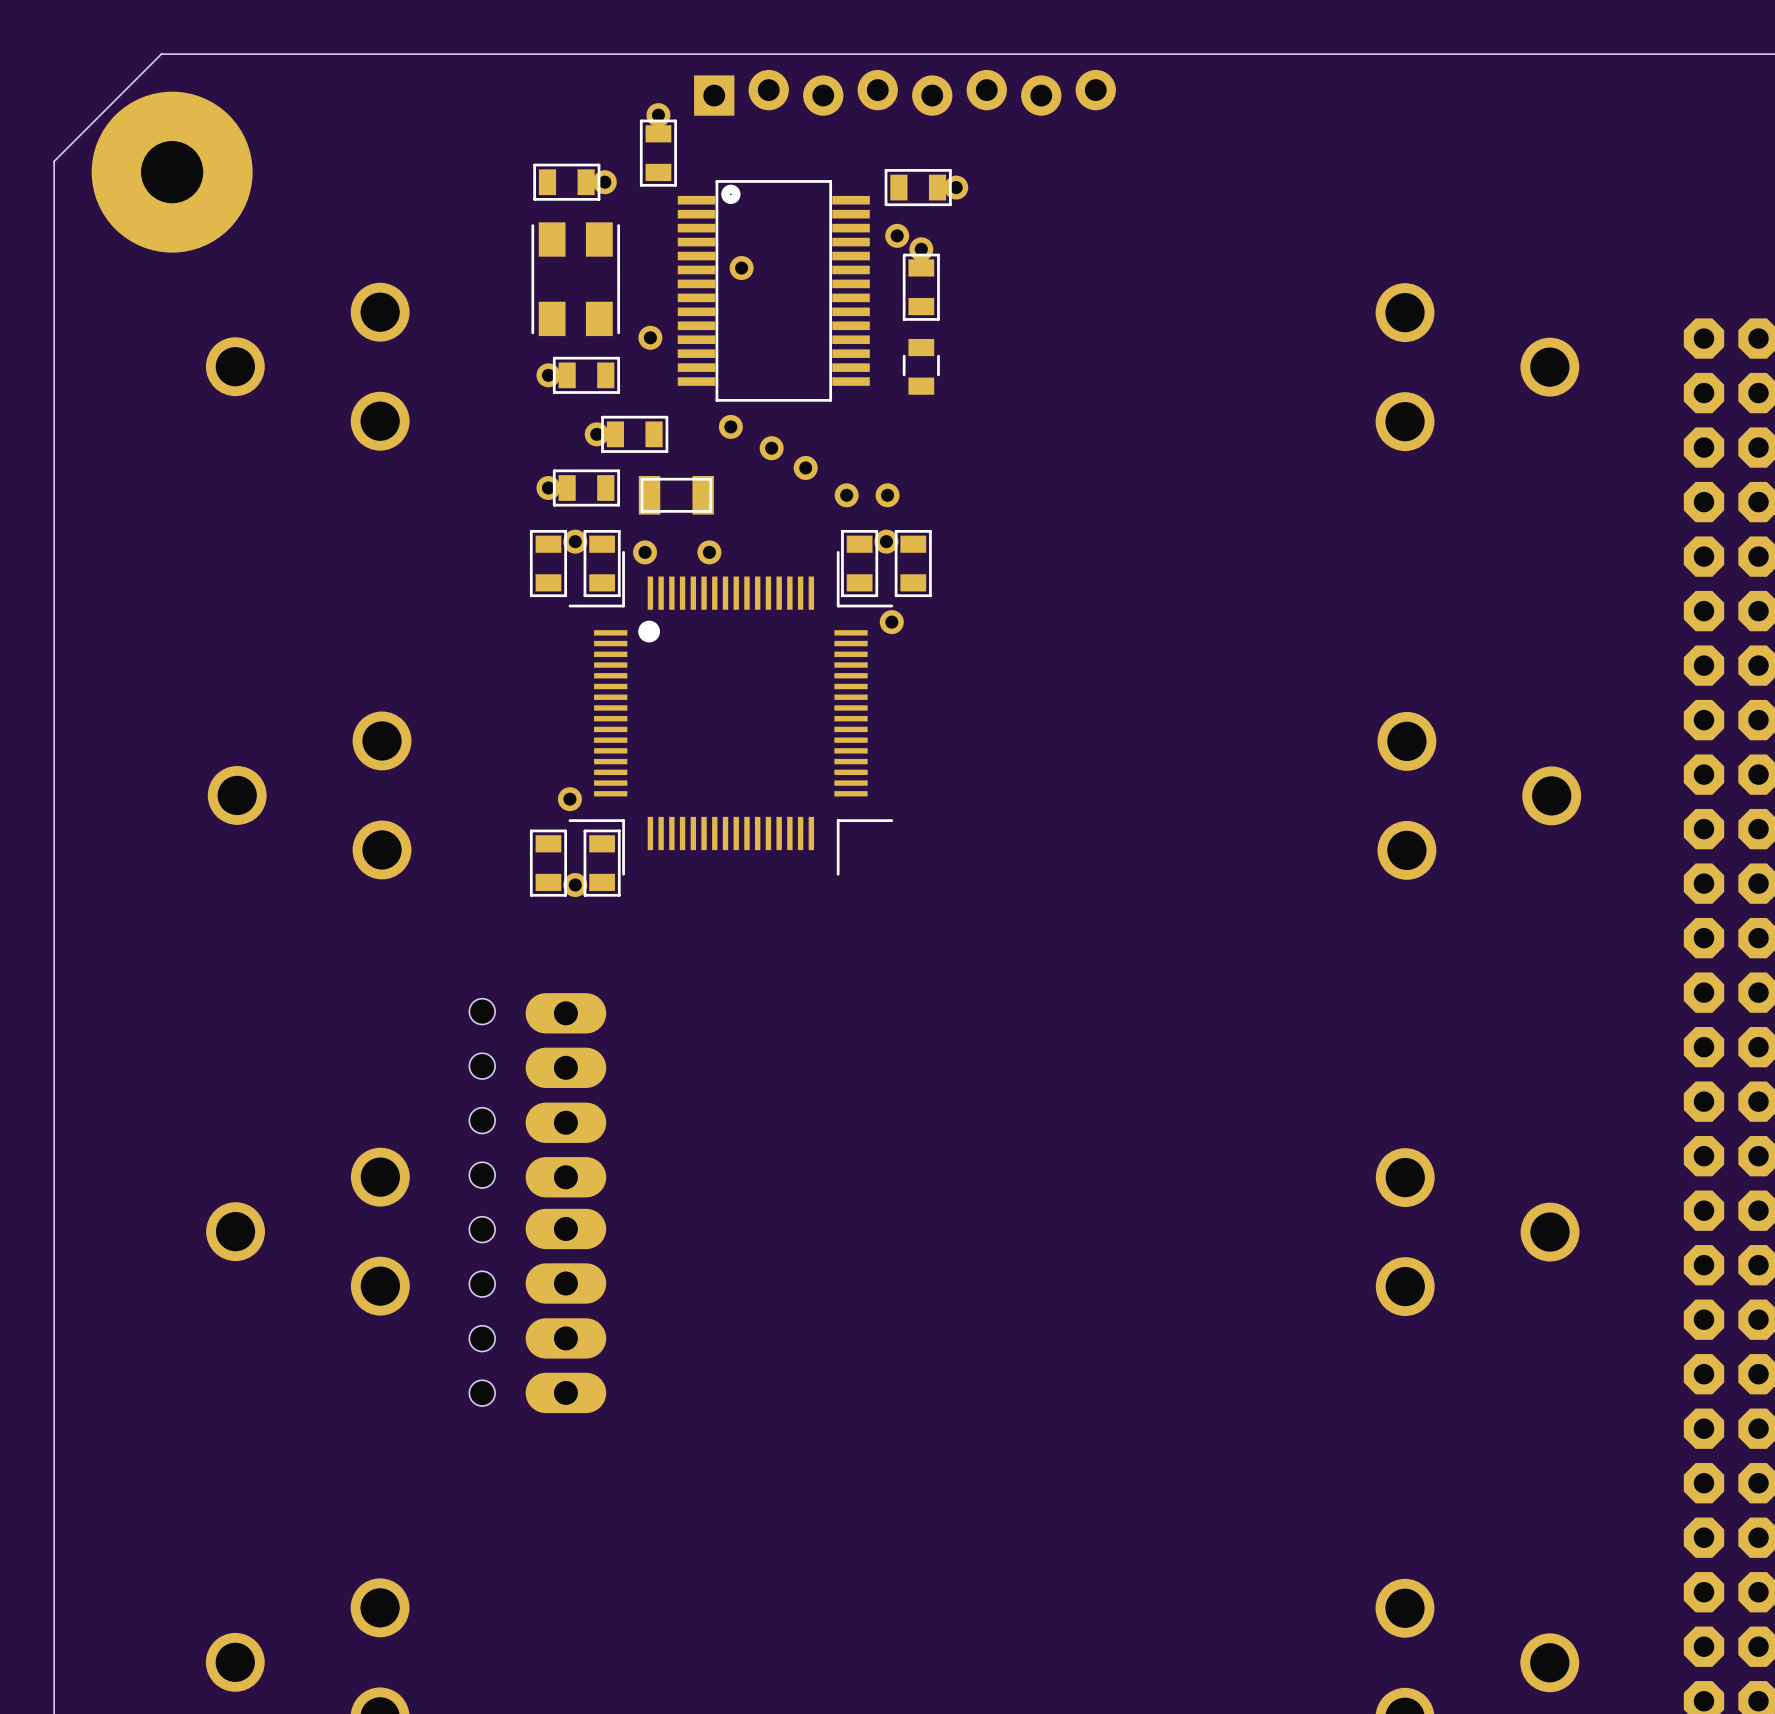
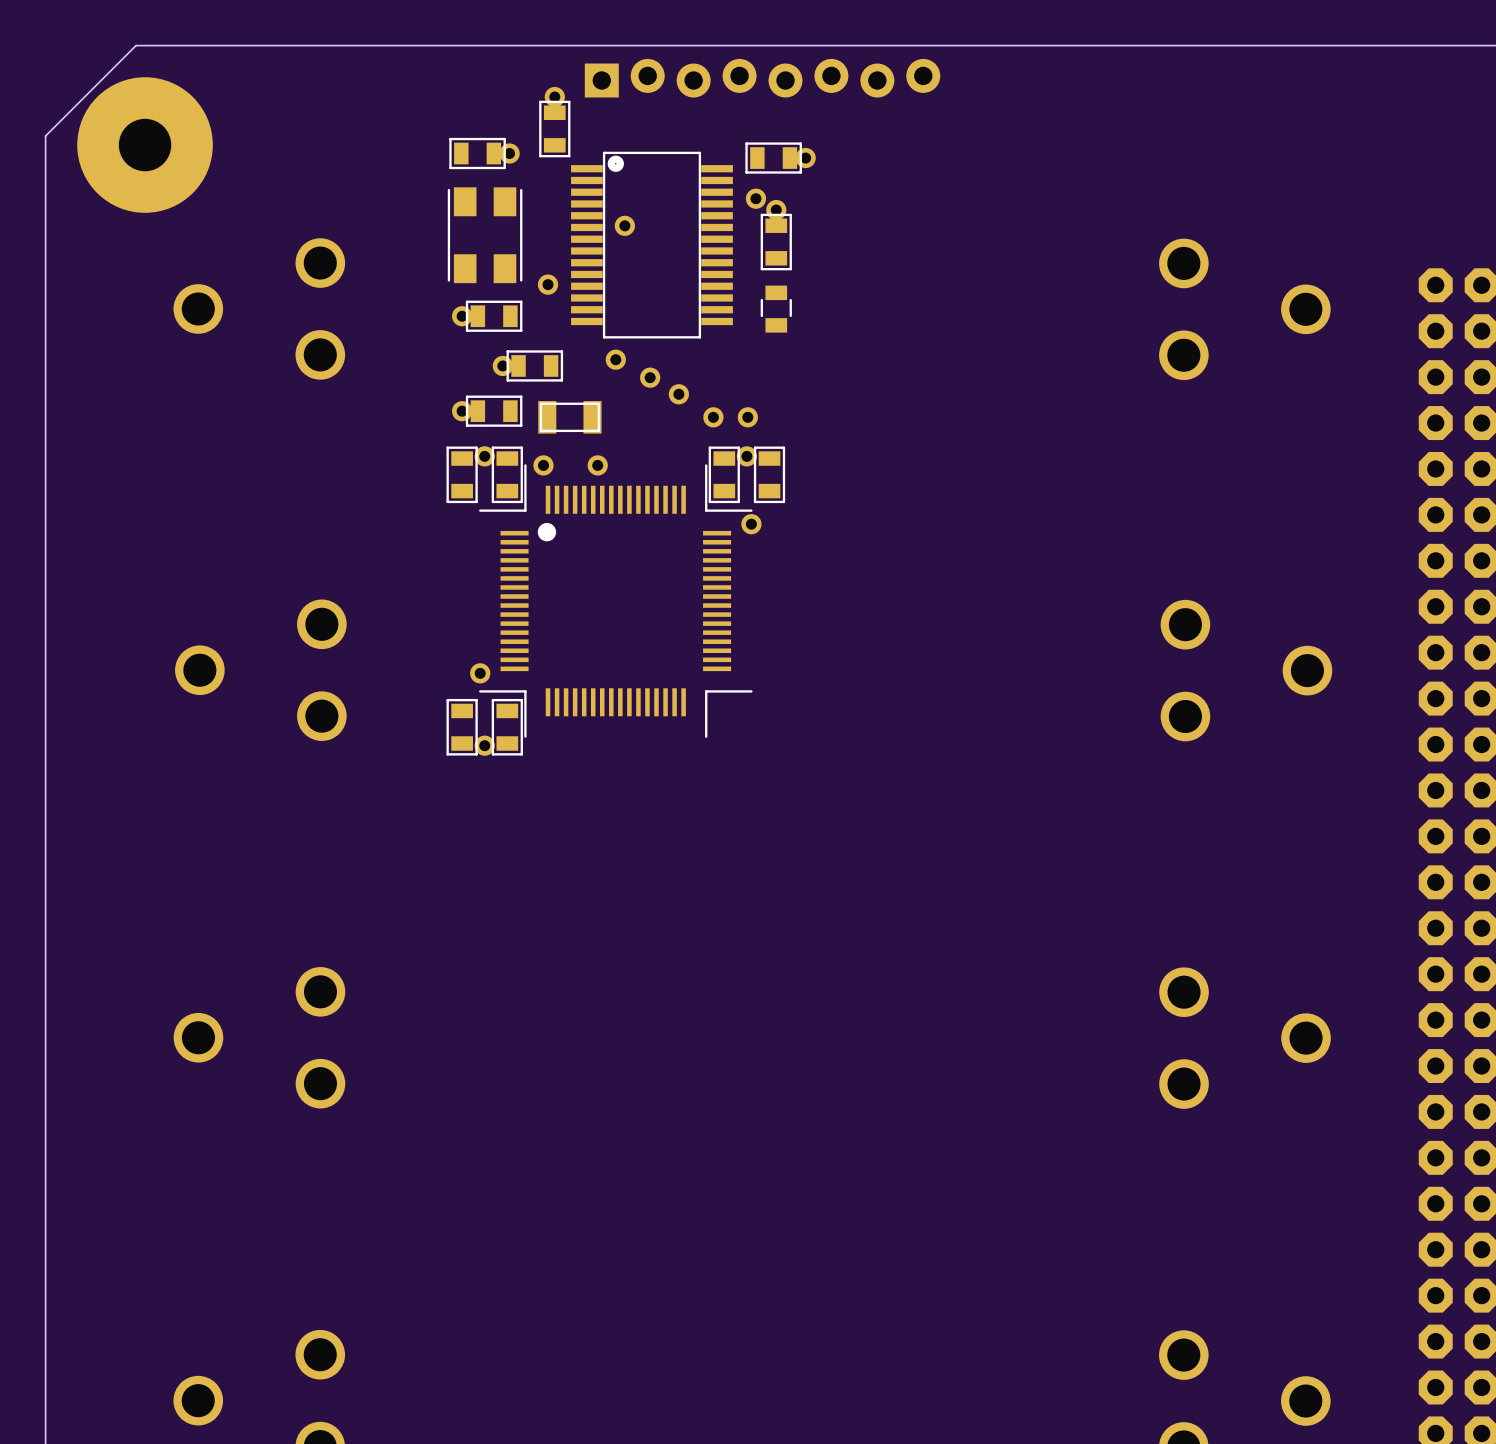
hole: (482, 1011) -> none
part: (565, 1040) -> none
hole: (482, 1066) -> none
hole: (482, 1120) -> none
part: (565, 1150) -> none
hole: (482, 1175) -> none
hole: (482, 1229) -> none
part: (565, 1256) -> none
hole: (482, 1284) -> none
hole: (482, 1338) -> none
part: (565, 1365) -> none
hole: (482, 1393) -> none

